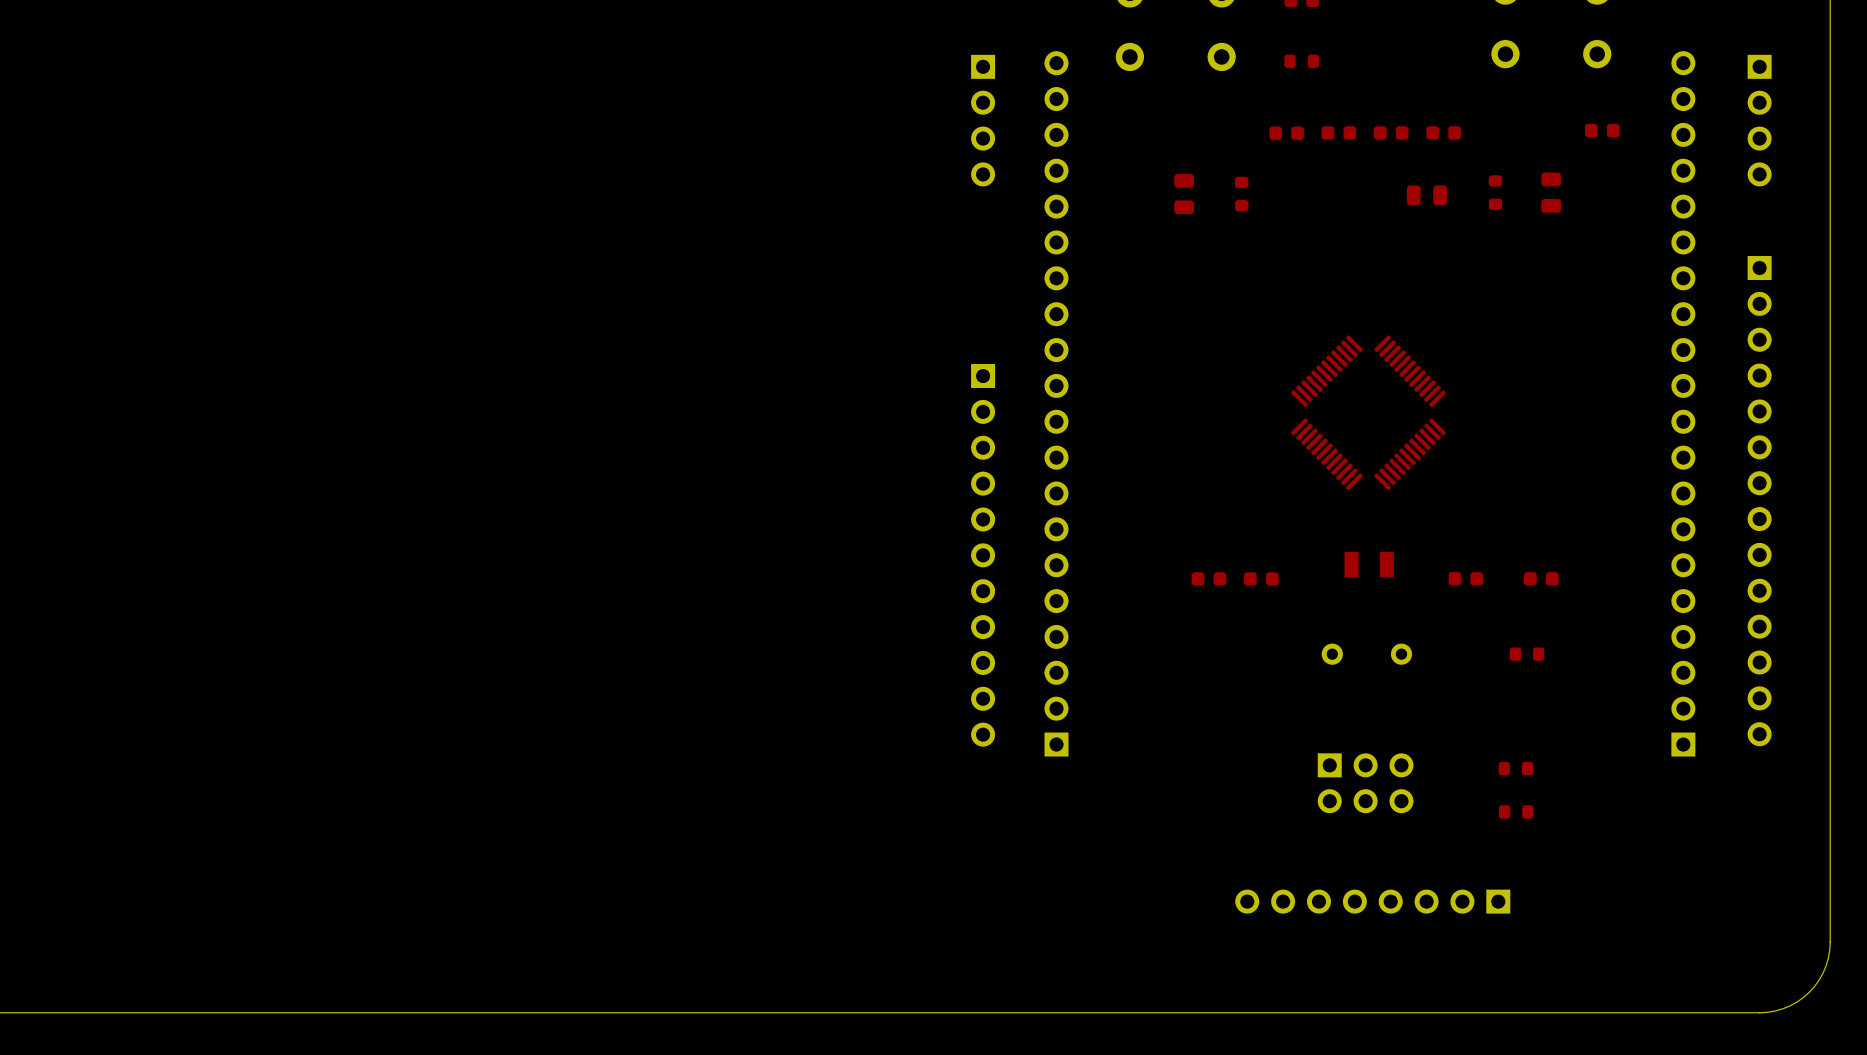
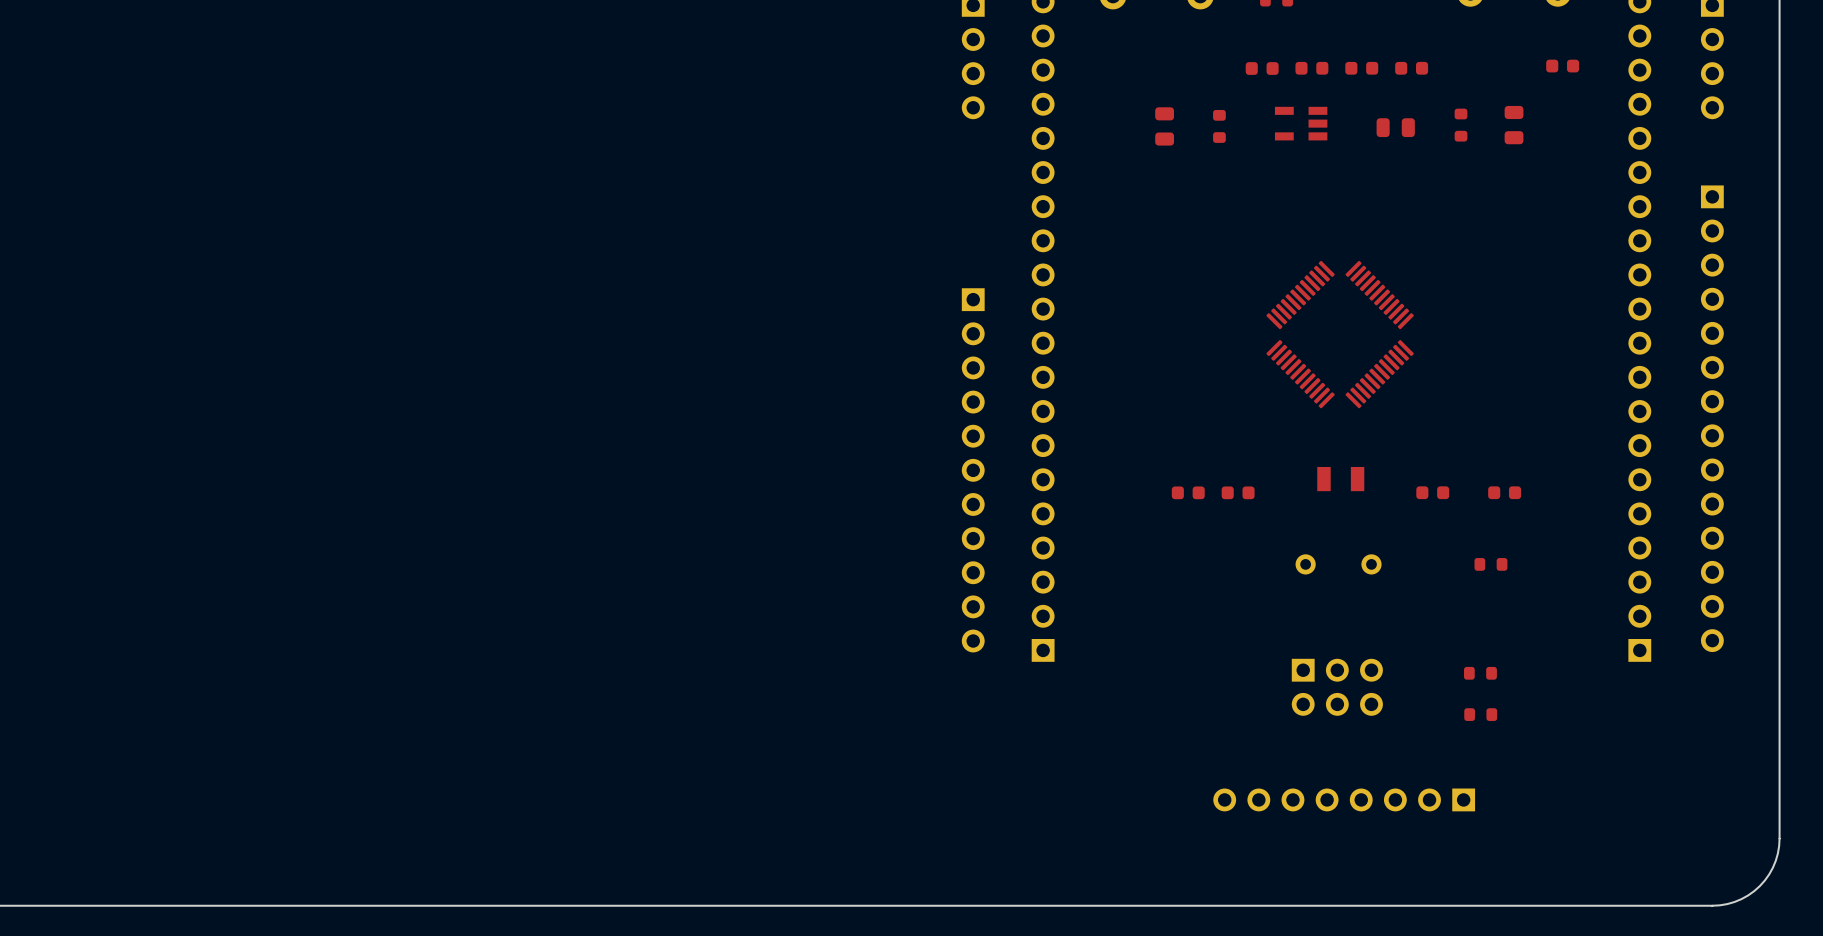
part: none -> (1301, 123)

